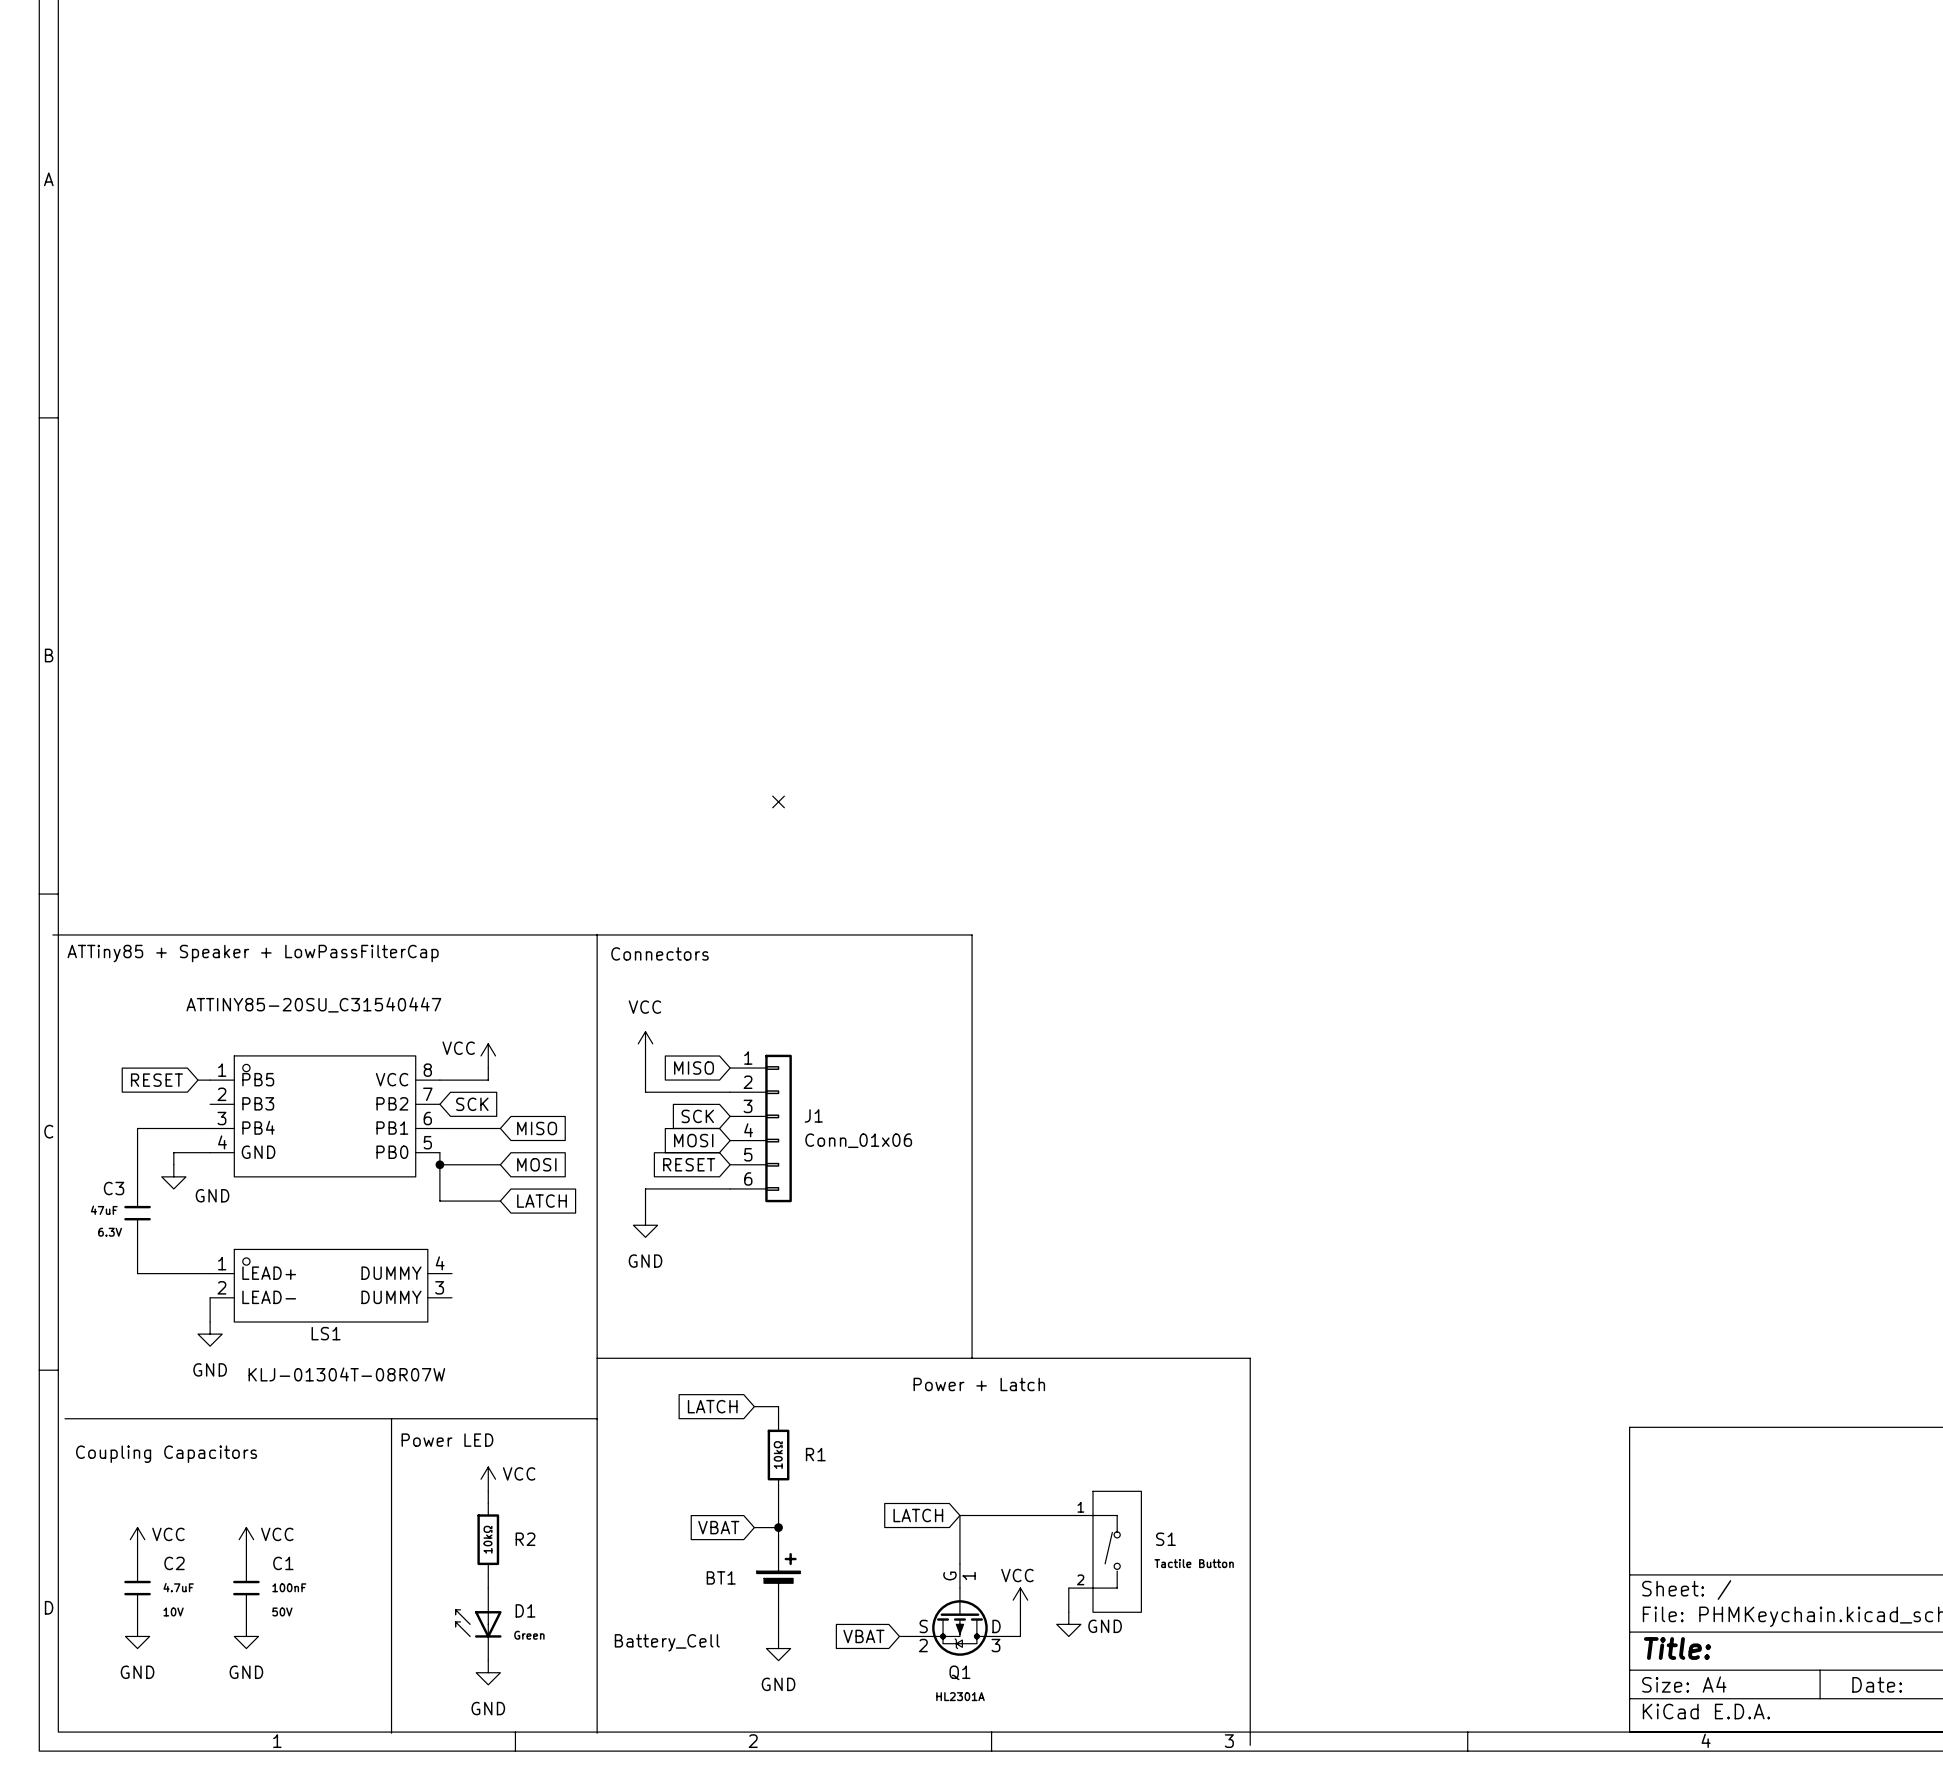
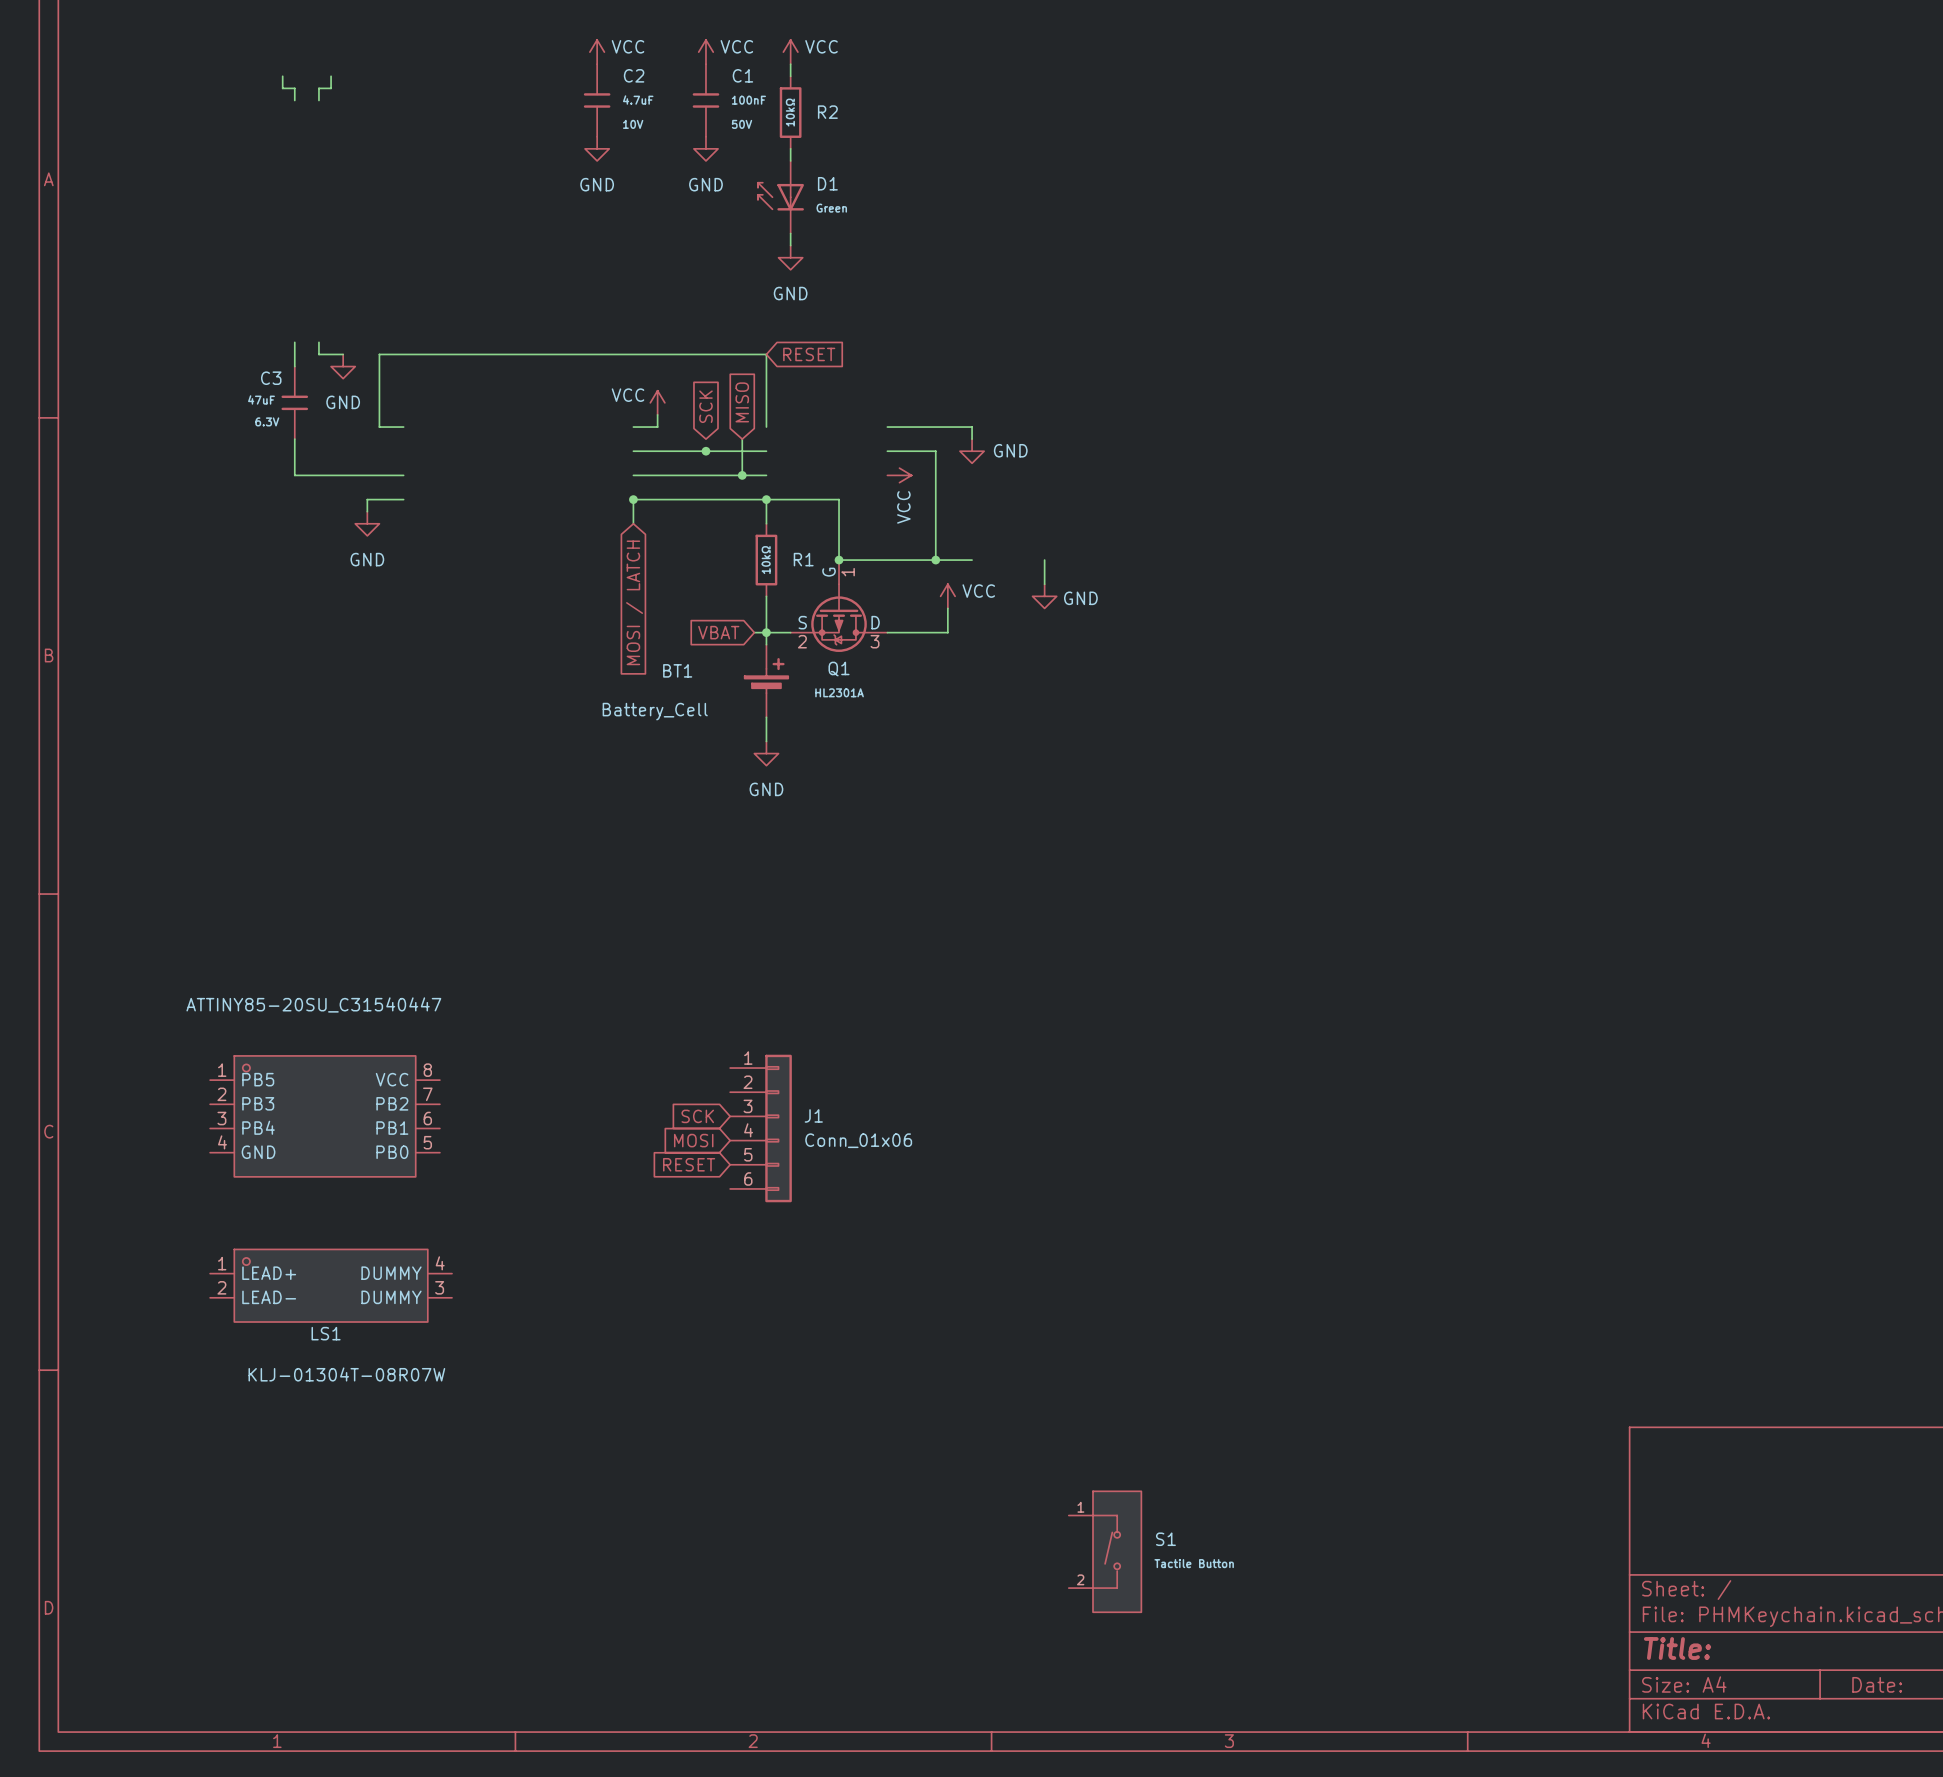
power symbol: none -> VCC (597, 52)
power symbol: none -> VCC (705, 52)
power symbol: none -> VCC (790, 52)
wire: none -> (790, 64) (790, 76)
wire: none -> (282, 76) (282, 88) (294, 88) (294, 100)
wire: none -> (331, 76) (331, 88) (318, 88) (318, 100)
power symbol: none -> GND (597, 148)
power symbol: none -> GND (705, 148)
wire: none -> (790, 148) (790, 160)
wire: none -> (790, 233) (790, 245)
power symbol: none -> GND (790, 257)
wire: none -> (294, 342) (294, 366)
wire: none -> (318, 342) (318, 354) (343, 354)
global label: none -> RESET (809, 354)
power symbol: none -> GND (343, 366)
power symbol: none -> VCC (657, 402)
global label: none -> MISO (742, 402)
global label: none -> SCK (705, 406)
wire: none -> (657, 414) (657, 427) (633, 427)
wire: none -> (403, 427) (379, 427) (379, 354) (766, 354) (766, 427)
wire: none -> (887, 427) (972, 427) (972, 439)
wire: none -> (294, 439) (294, 475) (403, 475)
wire: none -> (742, 439) (742, 475)
wire: none -> (633, 451) (766, 451)
junction: none -> (705, 451)
wire: none -> (887, 451) (935, 451) (935, 560)
power symbol: none -> GND (972, 451)
wire: none -> (633, 475) (766, 475)
junction: none -> (742, 475)
power symbol: none -> VCC (899, 475)
wire: none -> (403, 499) (367, 499) (367, 511)
junction: none -> (633, 499)
wire: none -> (766, 499) (766, 523)
junction: none -> (766, 499)
power symbol: none -> GND (367, 523)
wire: none -> (633, 523) (633, 499) (839, 499) (839, 560) (972, 560)
junction: none -> (839, 560)
junction: none -> (935, 560)
wire: none -> (1044, 560) (1044, 584)
wire: none -> (766, 596) (766, 644)
power symbol: none -> VCC (947, 596)
power symbol: none -> GND (1044, 596)
global label: none -> MOSI / LATCH (634, 602)
wire: none -> (947, 608) (947, 632) (887, 632)
global label: none -> VBAT (718, 632)
wire: none -> (754, 632) (790, 632)
junction: none -> (766, 632)
wire: none -> (766, 717) (766, 741)
power symbol: none -> GND (766, 753)
no-connect mark: (778, 801) -> none
line: (52, 934) (972, 934) (972, 1358) -> none
line: (597, 934) (597, 1733) -> none
text: ATTiny85 + Speaker + LowPassFilterCap (253, 953) -> none
text: Connectors (660, 953) -> none
power symbol: VCC (645, 1043) -> none
power symbol: VCC (488, 1055) -> none
wire: (645, 1055) (645, 1092) (730, 1092) -> none
wire: (488, 1068) (488, 1080) (439, 1080) -> none
global label: MISO (694, 1068) -> none
global label: RESET (156, 1080) -> none
wire: (198, 1080) (210, 1080) -> none
global label: SCK (472, 1104) -> none
wire: (210, 1128) (137, 1128) (137, 1176) -> none
wire: (439, 1128) (500, 1128) -> none
global label: MISO (537, 1128) -> none
wire: (210, 1152) (173, 1152) (173, 1164) -> none
wire: (439, 1152) (439, 1201) (500, 1201) -> none
wire: (439, 1164) (500, 1164) -> none
junction: (439, 1164) -> none
global label: MOSI (536, 1164) -> none
power symbol: GND (173, 1176) -> none
wire: (730, 1188) (645, 1188) (645, 1213) -> none
global label: LATCH (542, 1201) -> none
C3 position: (137, 1213) -> (294, 402)
power symbol: GND (645, 1225) -> none
wire: (137, 1249) (137, 1273) (210, 1273) -> none
wire: (210, 1297) (210, 1322) -> none
power symbol: GND (210, 1334) -> none
line: (597, 1358) (1250, 1358) (1250, 1745) -> none
text: Power + Latch (979, 1384) -> none
global label: LATCH (712, 1406) -> none
wire: (754, 1406) (778, 1406) (778, 1418) -> none
line: (64, 1418) (597, 1418) -> none
line: (391, 1418) (391, 1733) -> none
text: Power LED (447, 1440) -> none
text: Coupling Capacitors (166, 1454) -> none
R1 position: (778, 1455) -> (766, 560)
power symbol: VCC (488, 1479) -> none
wire: (488, 1491) (488, 1503) -> none
wire: (778, 1491) (778, 1539) -> none
global label: LATCH (918, 1515) -> none
wire: (1068, 1515) (959, 1515) (959, 1563) -> none
global label: VBAT (718, 1527) -> none
wire: (754, 1527) (778, 1527) -> none
junction: (778, 1527) -> none
power symbol: VCC (137, 1539) -> none
power symbol: VCC (246, 1539) -> none
R2 position: (488, 1539) -> (790, 112)
wire: (488, 1575) (488, 1588) -> none
BT1 position: (778, 1575) -> (766, 681)
BT1 name position: BT1 (721, 1577) -> BT1 (677, 670)
C2 position: (137, 1588) -> (597, 100)
C1 position: (246, 1588) -> (705, 100)
wire: (1068, 1588) (1068, 1612) -> none
power symbol: VCC (1020, 1600) -> none
Q1 position: (959, 1609) -> (839, 606)
wire: (778, 1612) (778, 1636) -> none
wire: (1020, 1612) (1020, 1636) (1008, 1636) -> none
D1 position: (478, 1624) -> (780, 197)
power symbol: GND (1068, 1624) -> none
power symbol: GND (137, 1636) -> none
power symbol: GND (246, 1636) -> none
global label: VBAT (863, 1636) -> none
wire: (899, 1636) (911, 1636) -> none
BT1 value position: Battery_Cell (667, 1642) -> Battery_Cell (655, 711)
power symbol: GND (778, 1648) -> none
power symbol: GND (488, 1672) -> none

